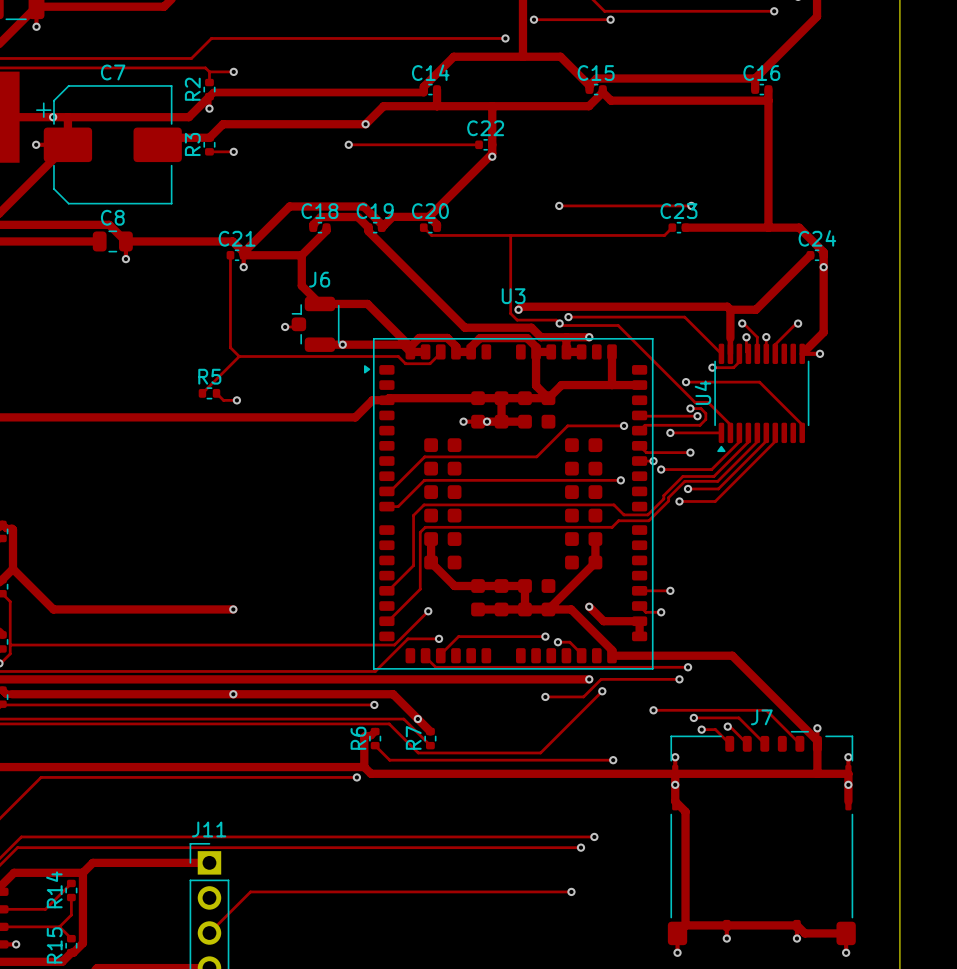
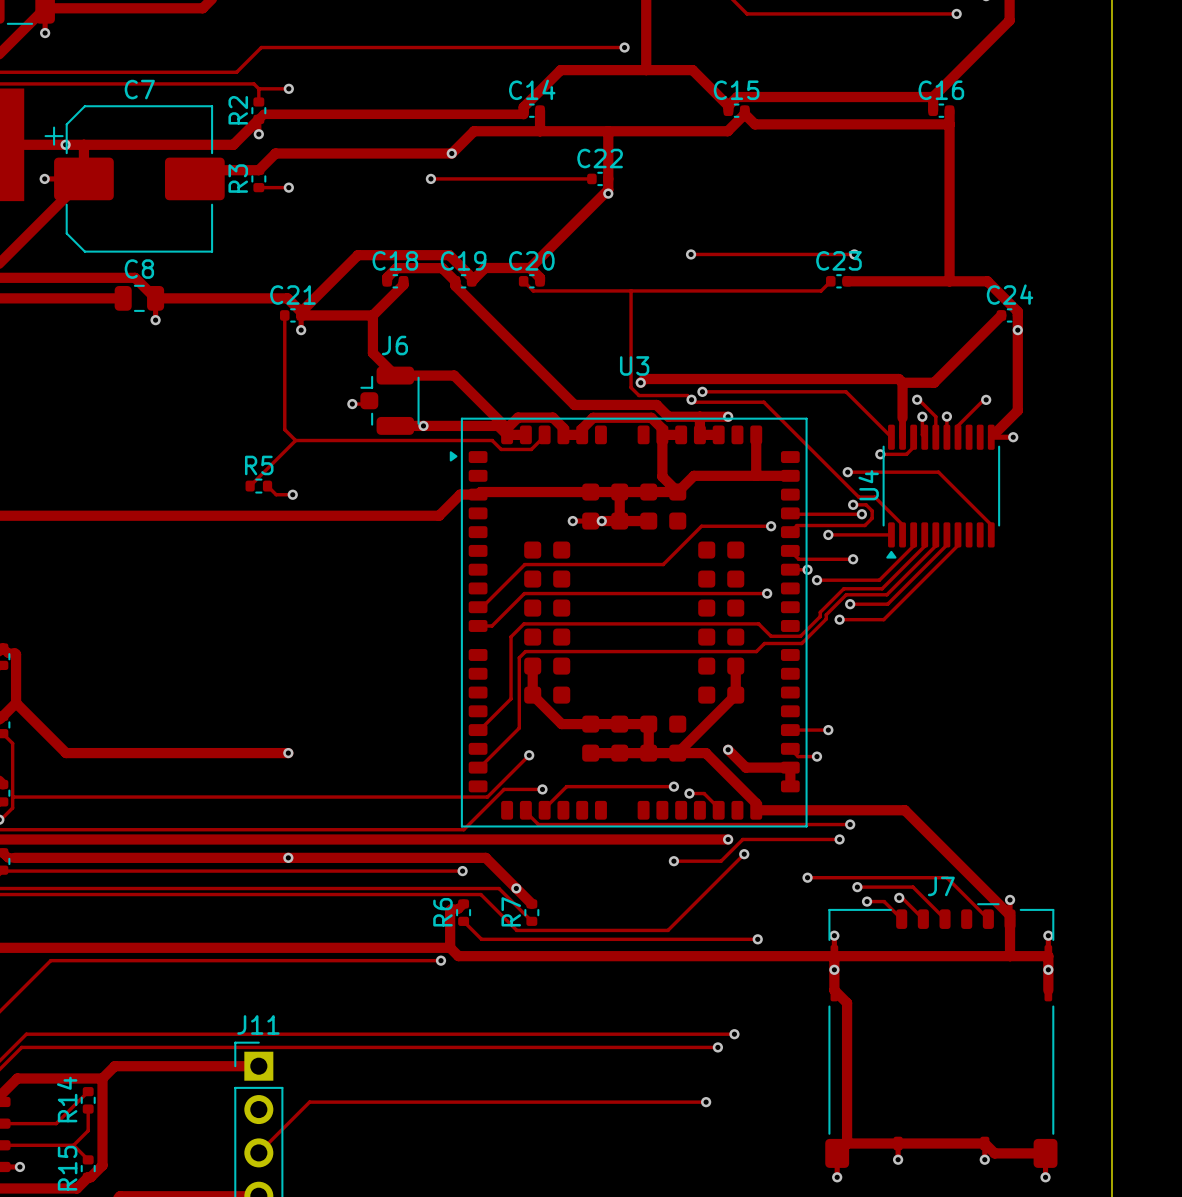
track: (533, 19) (610, 19) -> none
via: (533, 19) -> none
via: (610, 19) -> none

